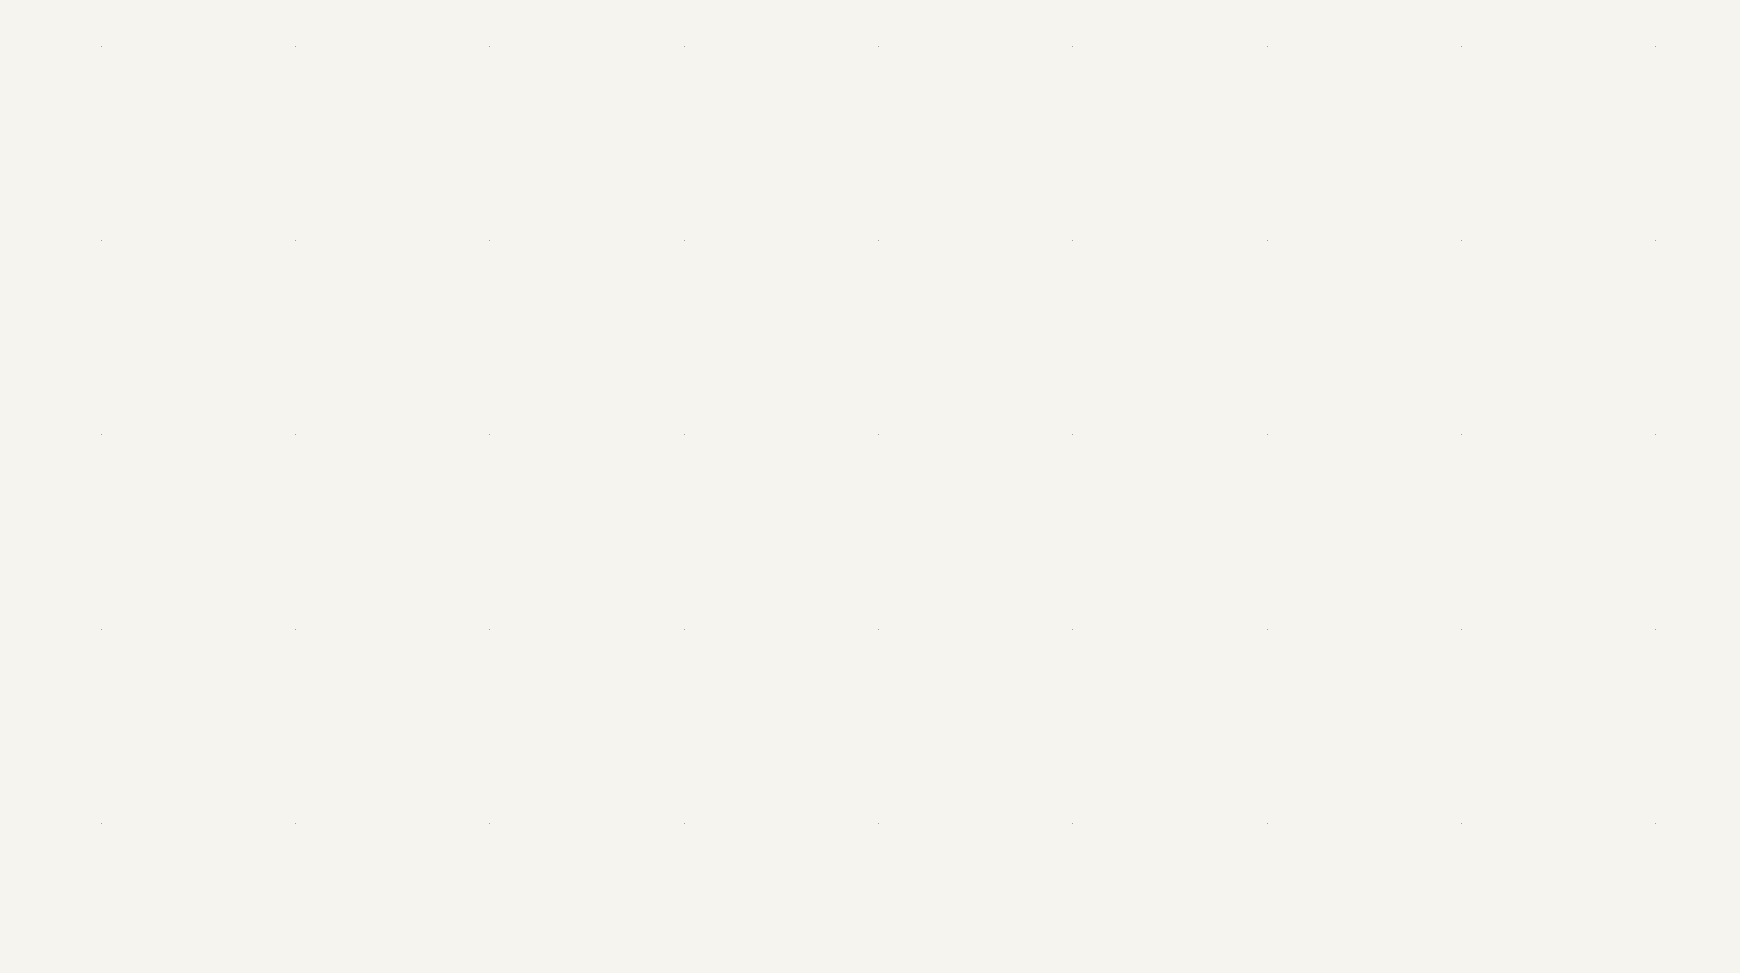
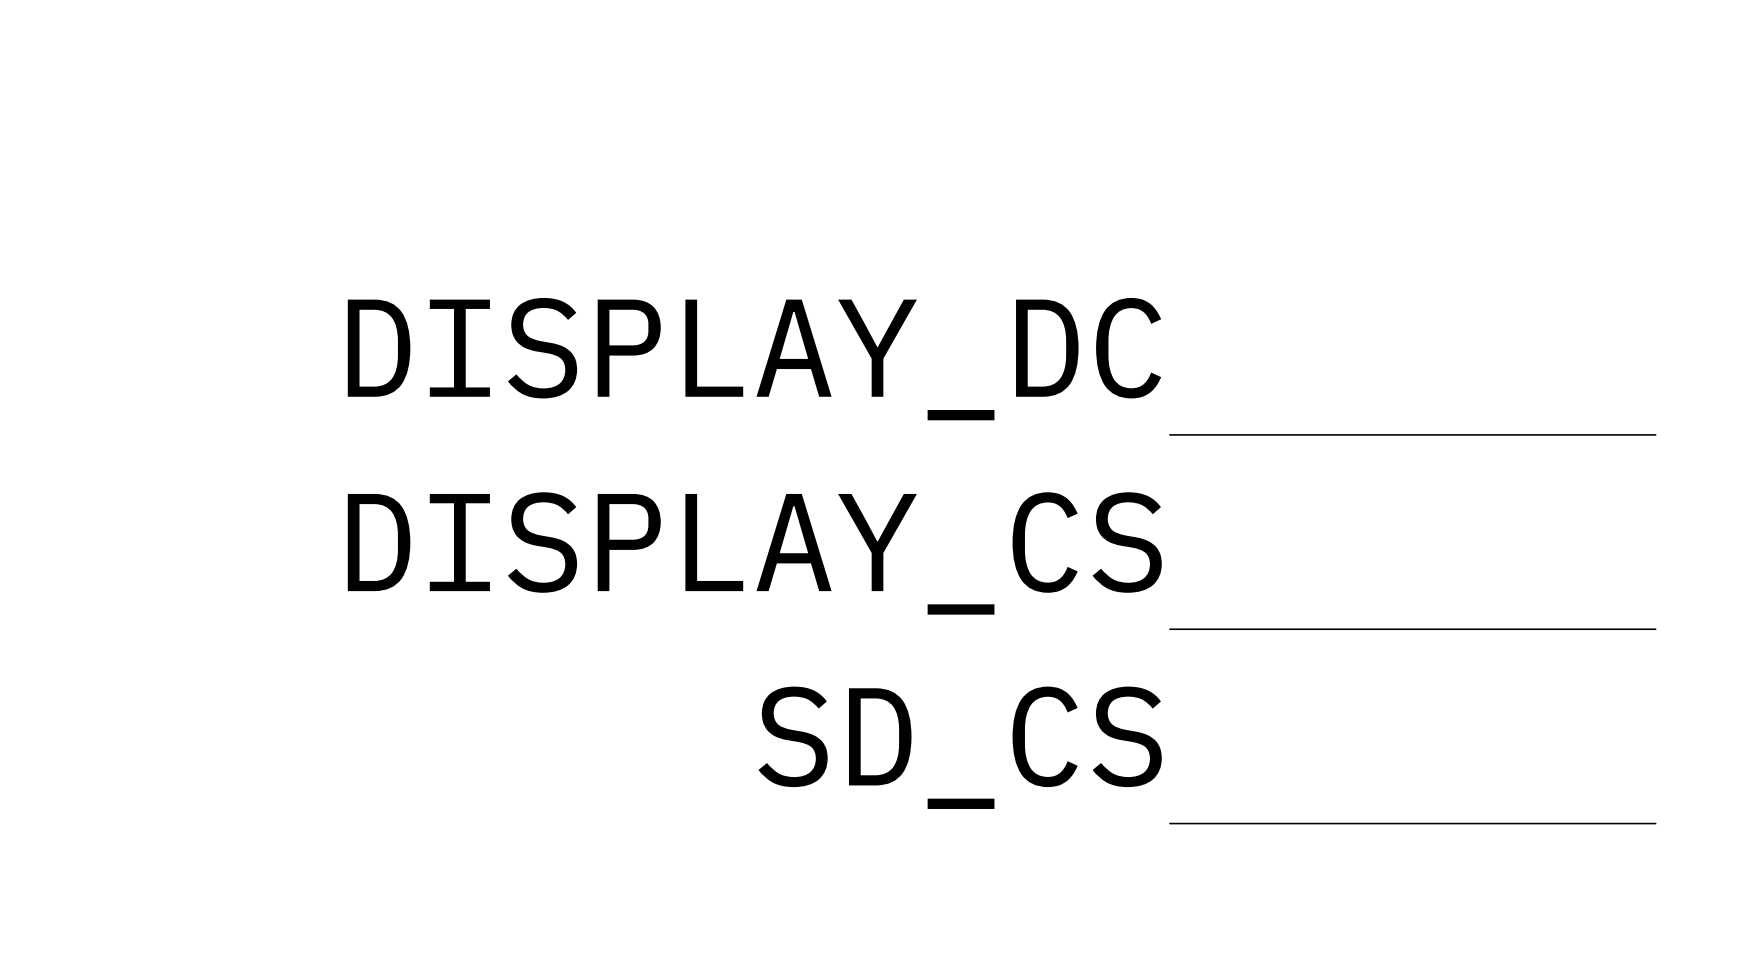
label: none -> DISPLAY_DC (754, 359)
wire: none -> (1169, 434) (1655, 434)
label: none -> DISPLAY_CS (754, 553)
wire: none -> (1169, 629) (1655, 629)
label: none -> SD_CS (960, 747)
wire: none -> (1169, 823) (1655, 823)

